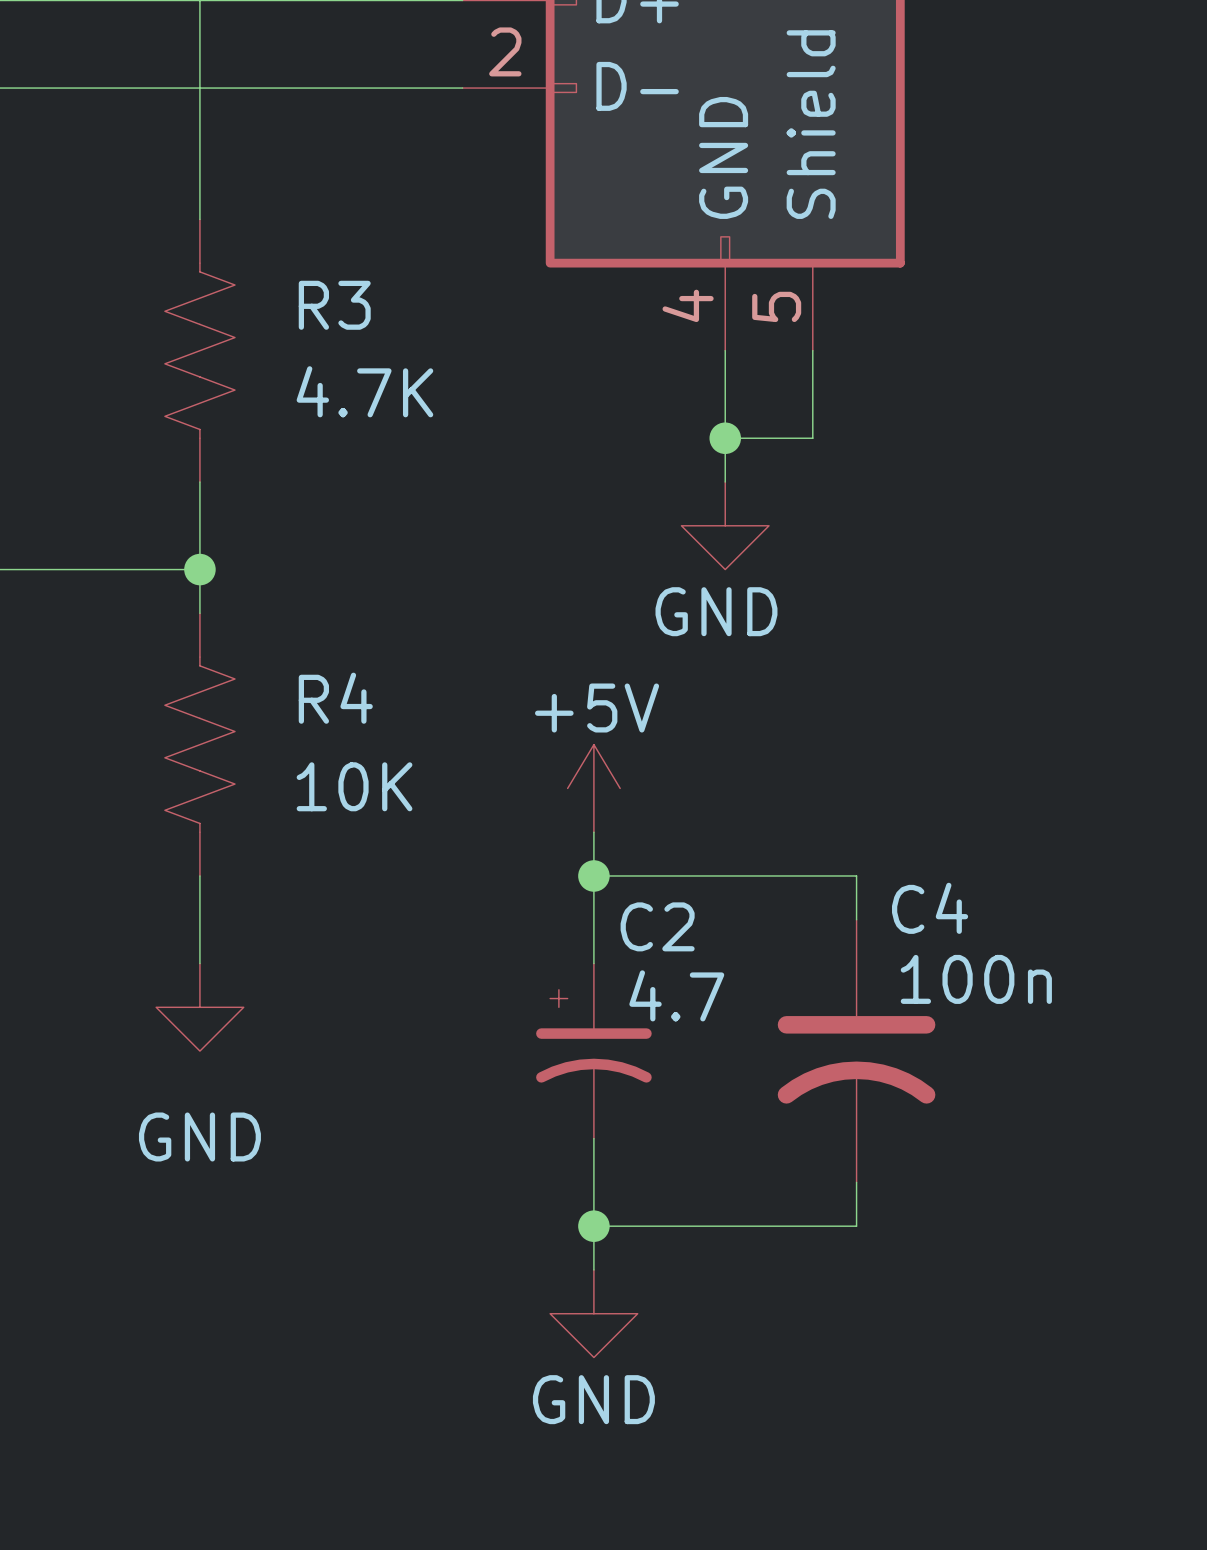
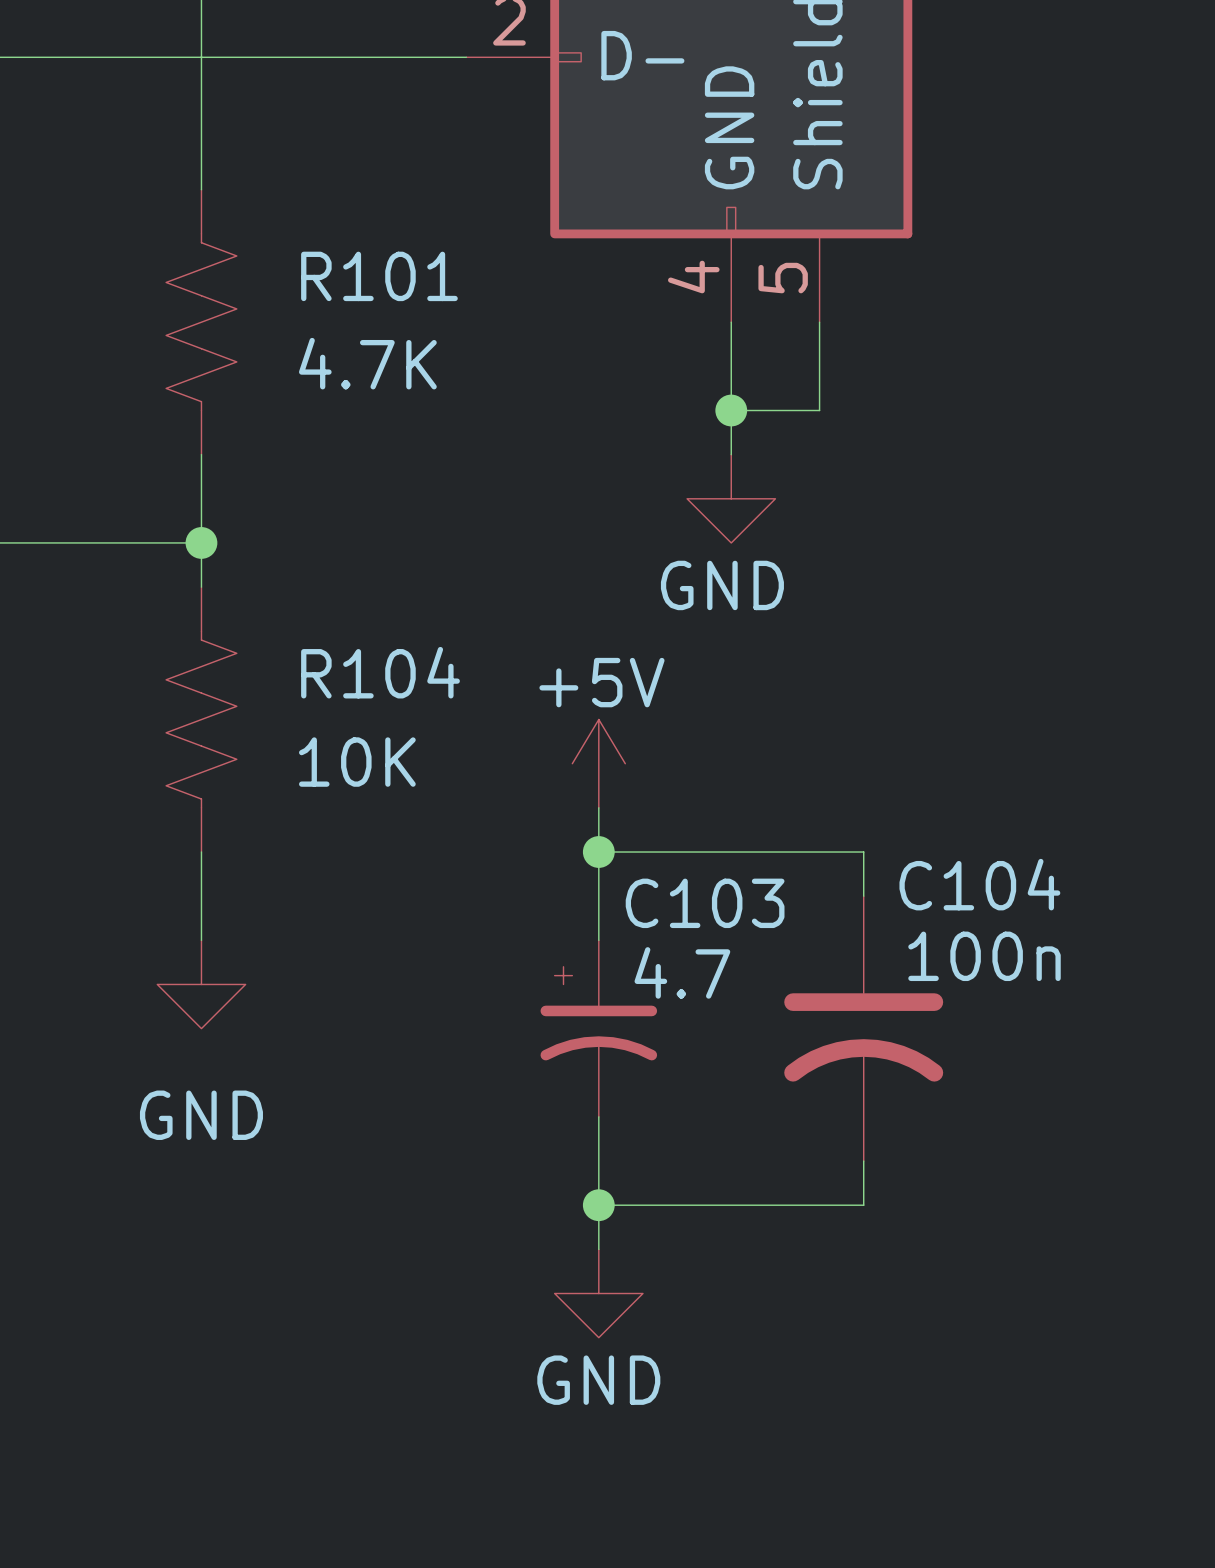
R3 name: R3 (334, 305) -> R101 (379, 276)
R4 name: R4 (335, 698) -> R104 (380, 672)
C4 name: C4 (930, 908) -> C104 (979, 884)
C2 name: C2 (657, 926) -> C103 (705, 903)

